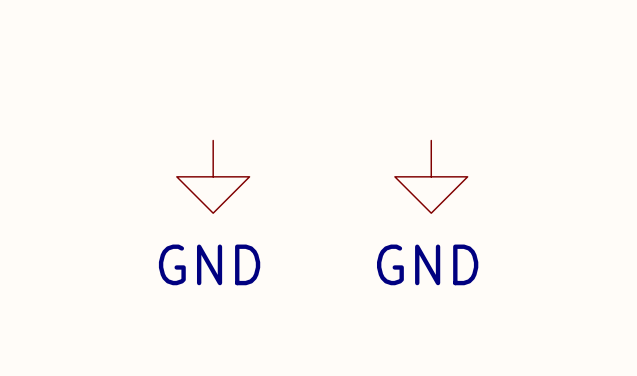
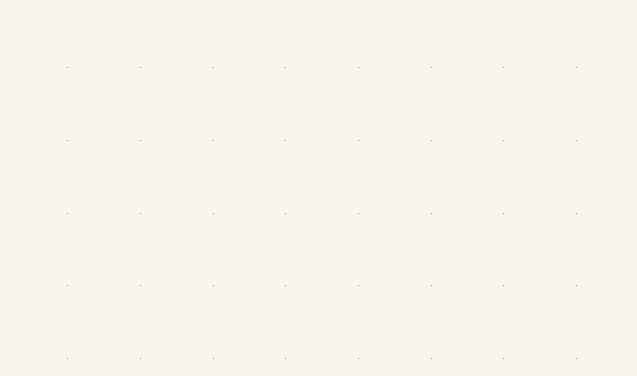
power symbol: GND (213, 176) -> none
power symbol: GND (431, 176) -> none

